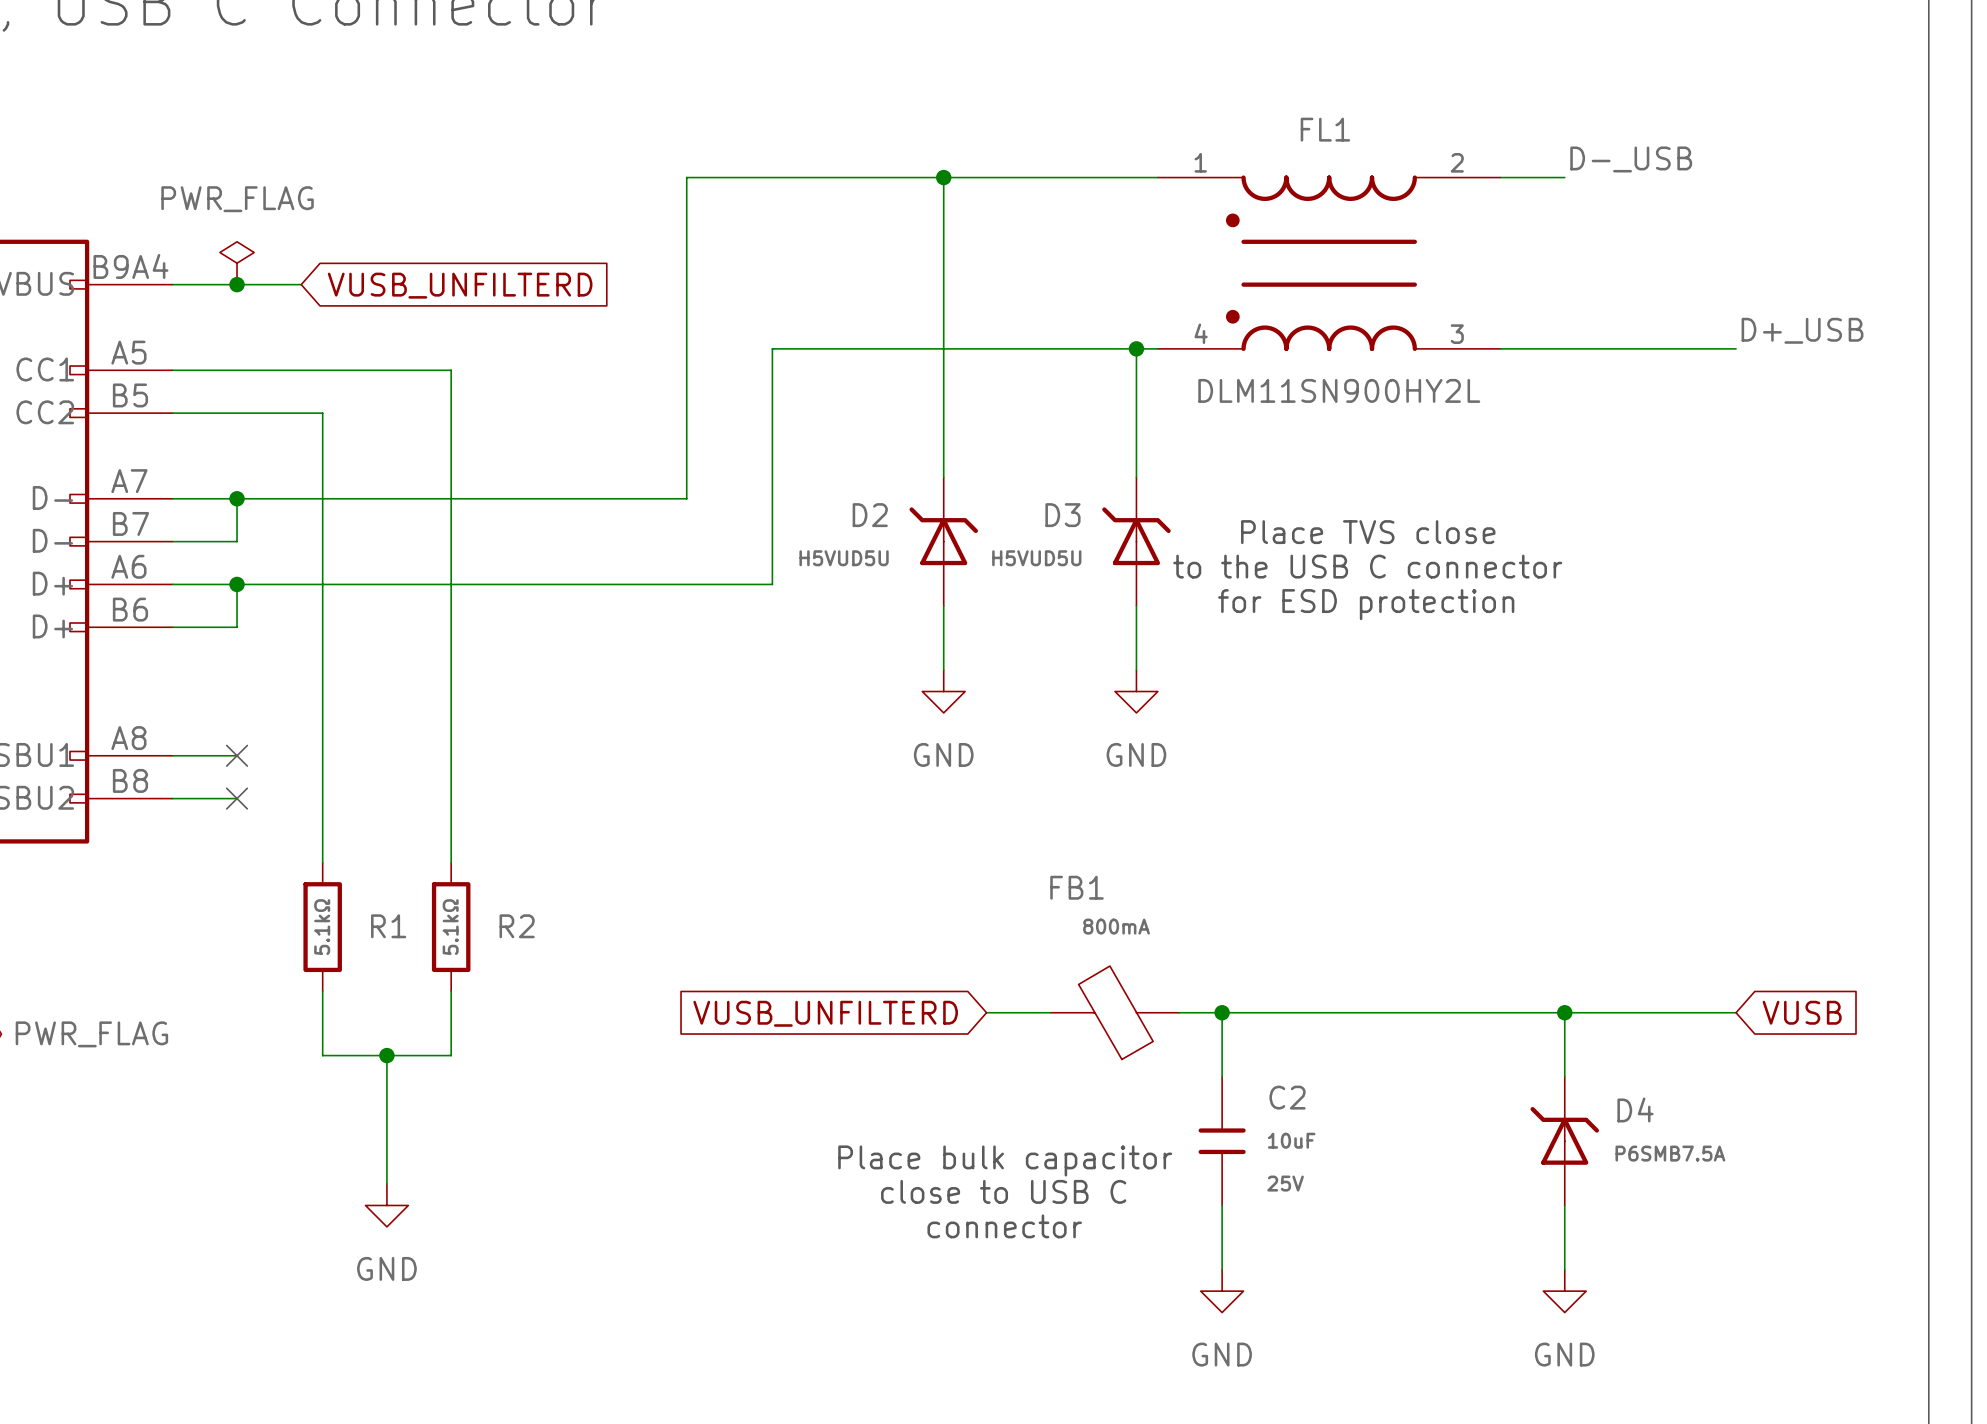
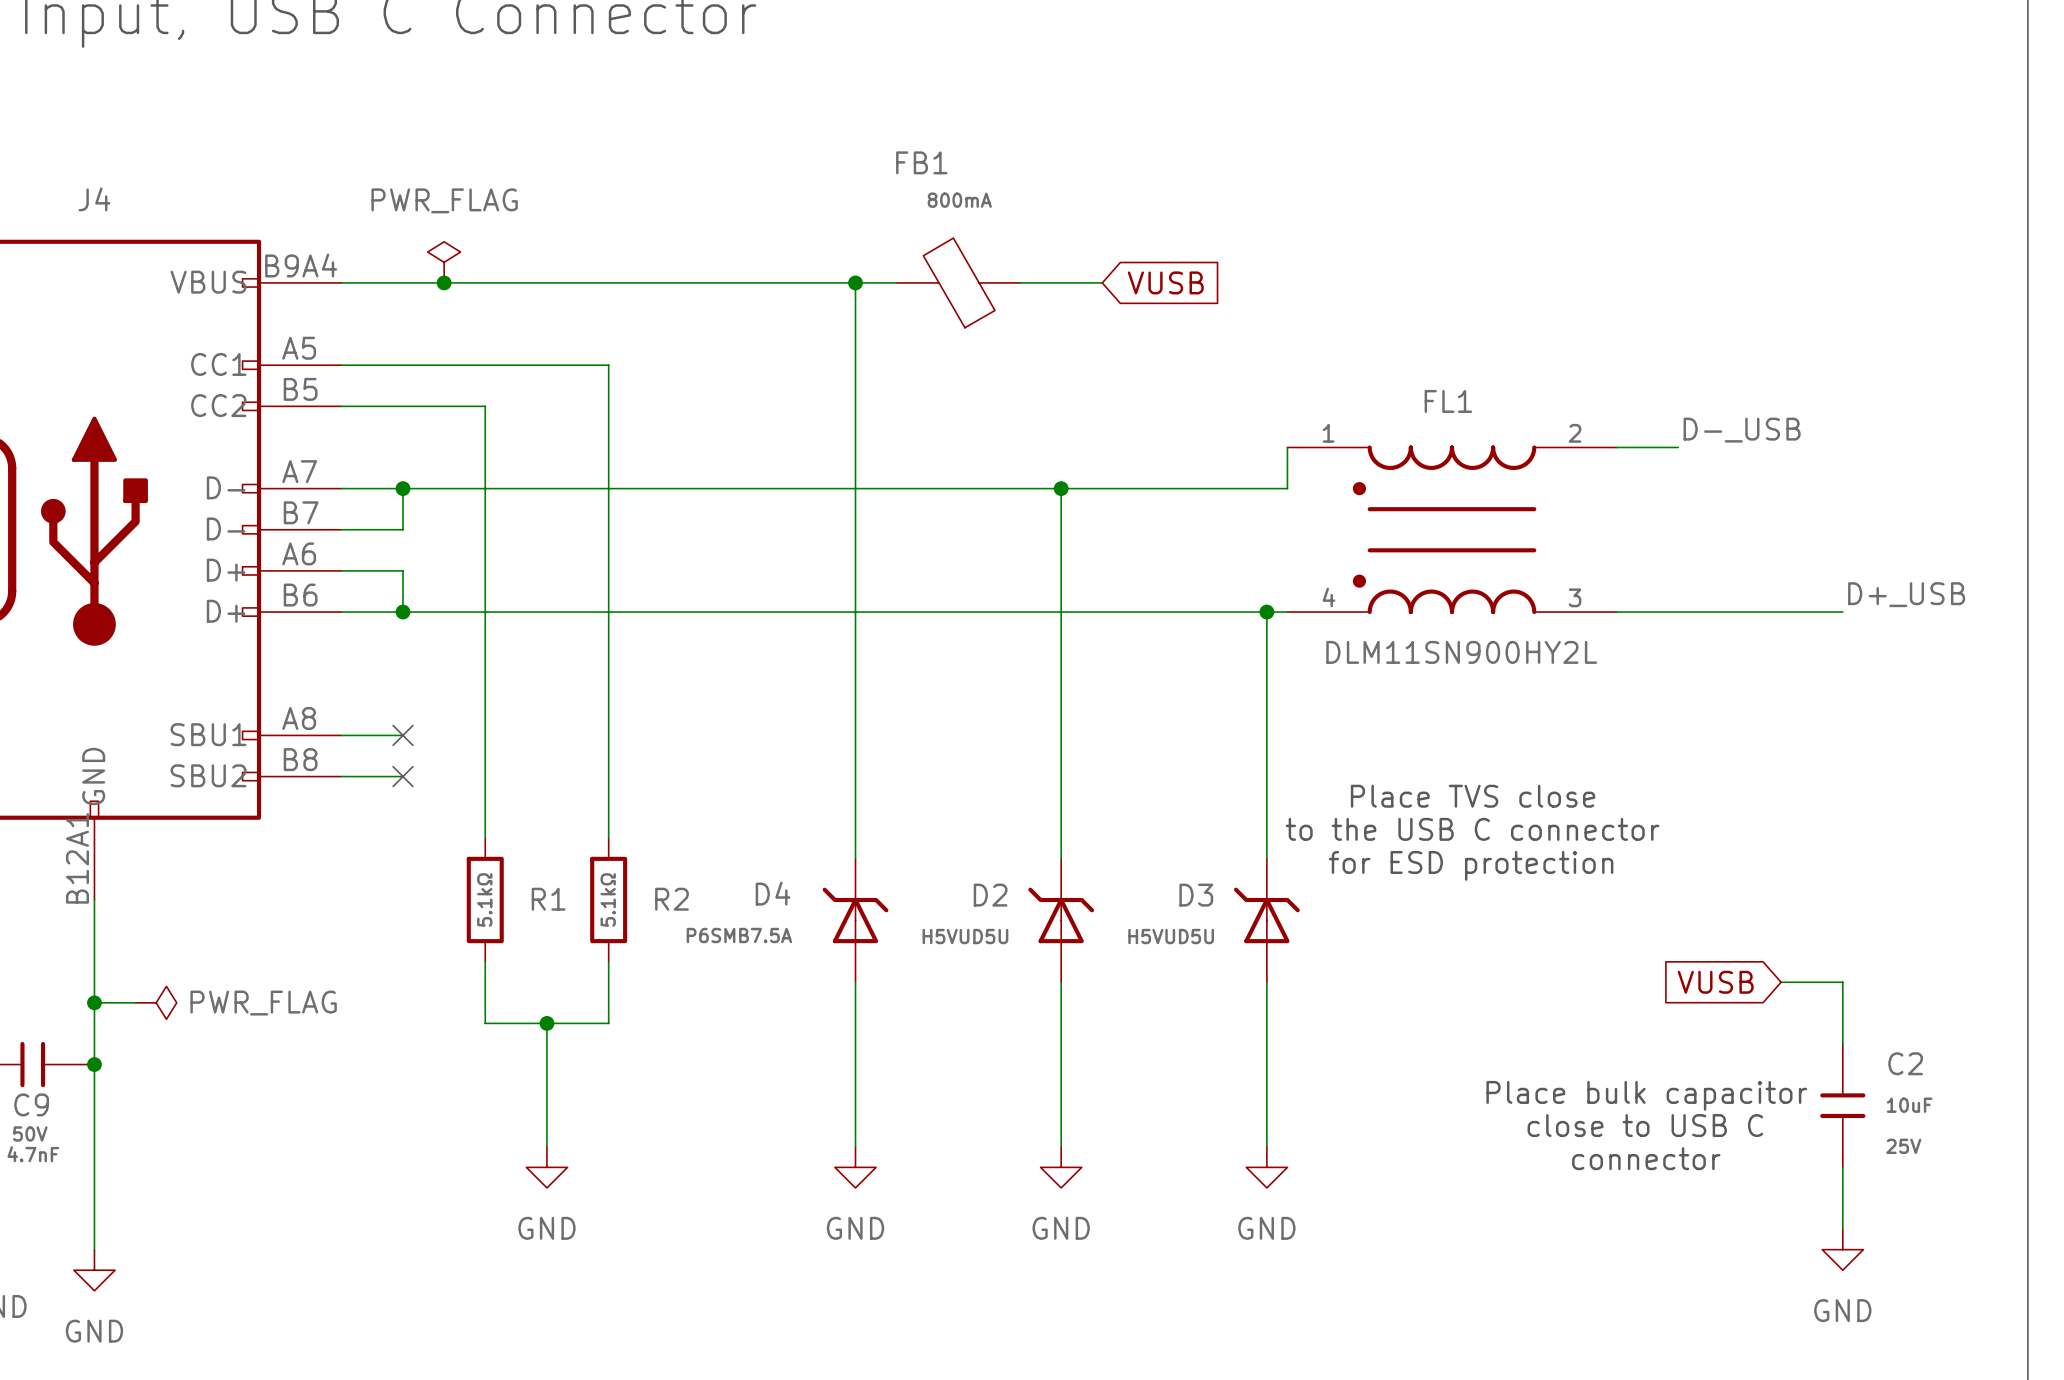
label position: D-_USB (1631, 159) -> D-_USB (1742, 430)
wire: (943, 177) (943, 477) -> none
junction: (943, 177) -> none
wire: (1157, 177) (686, 177) (686, 498) -> (1287, 447) (1287, 488) (834, 488)
wire: (1500, 177) (1564, 177) -> (1616, 447) (1678, 447)
power symbol position: PWR_FLAG (237, 263) -> PWR_FLAG (444, 262)
FL1 position: (1329, 263) -> (1451, 529)
junction position: (237, 284) -> (444, 282)
wire: none -> (464, 282) (896, 282)
wire: none -> (855, 282) (855, 858)
junction: none -> (855, 282)
wire: none -> (1020, 282) (1102, 282)
global label: none -> VUSB (1165, 282)
global label: VUSB_UNFILTERD (460, 285) -> none
label position: D+_USB (1802, 330) -> D+_USB (1906, 594)
wire: (1136, 348) (1136, 477) -> none
junction: (1136, 348) -> none
wire: (1157, 348) (772, 348) (772, 584) (237, 584) -> none
wire: (1500, 348) (1736, 348) -> (1616, 612) (1842, 612)
wire: none -> (1061, 488) (1061, 858)
junction: none -> (1061, 488)
text position: Place TVS close (1368, 532) -> Place TVS close (1473, 796)
D2 position: (943, 541) -> (1061, 920)
D3 position: (1136, 541) -> (1266, 920)
text position: to the USB C connector (1367, 566) -> to the USB C connector (1472, 829)
junction position: (237, 584) -> (402, 612)
text position: for ESD protection (1366, 604) -> for ESD protection (1471, 865)
wire: (943, 605) (943, 670) -> none
wire: (1136, 605) (1136, 627) -> none
wire: none -> (402, 612) (1287, 612)
junction: none -> (1266, 612)
wire: none -> (1266, 653) (1266, 858)
power symbol: GND (943, 691) -> none
power symbol: GND (1136, 691) -> none
wire: none -> (855, 982) (855, 1146)
wire: none -> (1061, 982) (1061, 1146)
wire: (986, 1012) (1050, 1012) -> none
FB1 position: (1115, 1012) -> (958, 282)
wire: none -> (1266, 982) (1266, 1146)
wire: (1179, 1012) (1671, 1012) -> none
wire: (1222, 1012) (1222, 1076) -> none
junction: (1222, 1012) -> none
wire: (1564, 1012) (1564, 1076) -> (1842, 982) (1842, 1043)
junction: (1564, 1012) -> none
global label rotation: 0° (1802, 1012) -> 180° (1715, 982)
global label position: VUSB (1802, 1012) -> VUSB (1715, 982)
global label: VUSB_UNFILTERD (825, 1013) -> none
D4 name position: D4 (1635, 1109) -> D4 (773, 893)
text: none -> Place bulk capacitor (1646, 1095)
C2 position: (1222, 1141) -> (1842, 1105)
D4 position: (1564, 1141) -> (855, 920)
D4 value position: P6SMB7.5A (1670, 1153) -> P6SMB7.5A (739, 935)
text: Place bulk capacitor (1005, 1160) -> none
text: none -> close to USB C (1645, 1125)
text: close to USB C (1003, 1191) -> none
text: none -> connector (1646, 1158)
power symbol: none -> GND (855, 1167)
power symbol: none -> GND (1061, 1167)
wire: (1222, 1205) (1222, 1269) -> none
wire: (1564, 1205) (1564, 1269) -> (1842, 1167) (1842, 1229)
text: connector (1004, 1226) -> none
power symbol position: GND (1222, 1291) -> GND (1266, 1167)
power symbol position: GND (1564, 1291) -> GND (1842, 1249)

